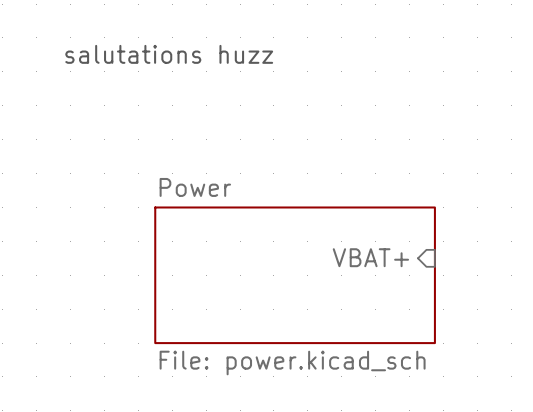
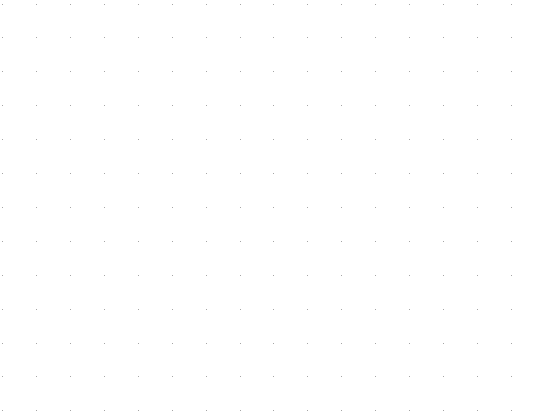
text: salutations huzz (169, 54) -> none
sheet pin: VBAT+ (370, 257) -> none
sheet Power: File: power.kicad_sch (295, 275) -> none

